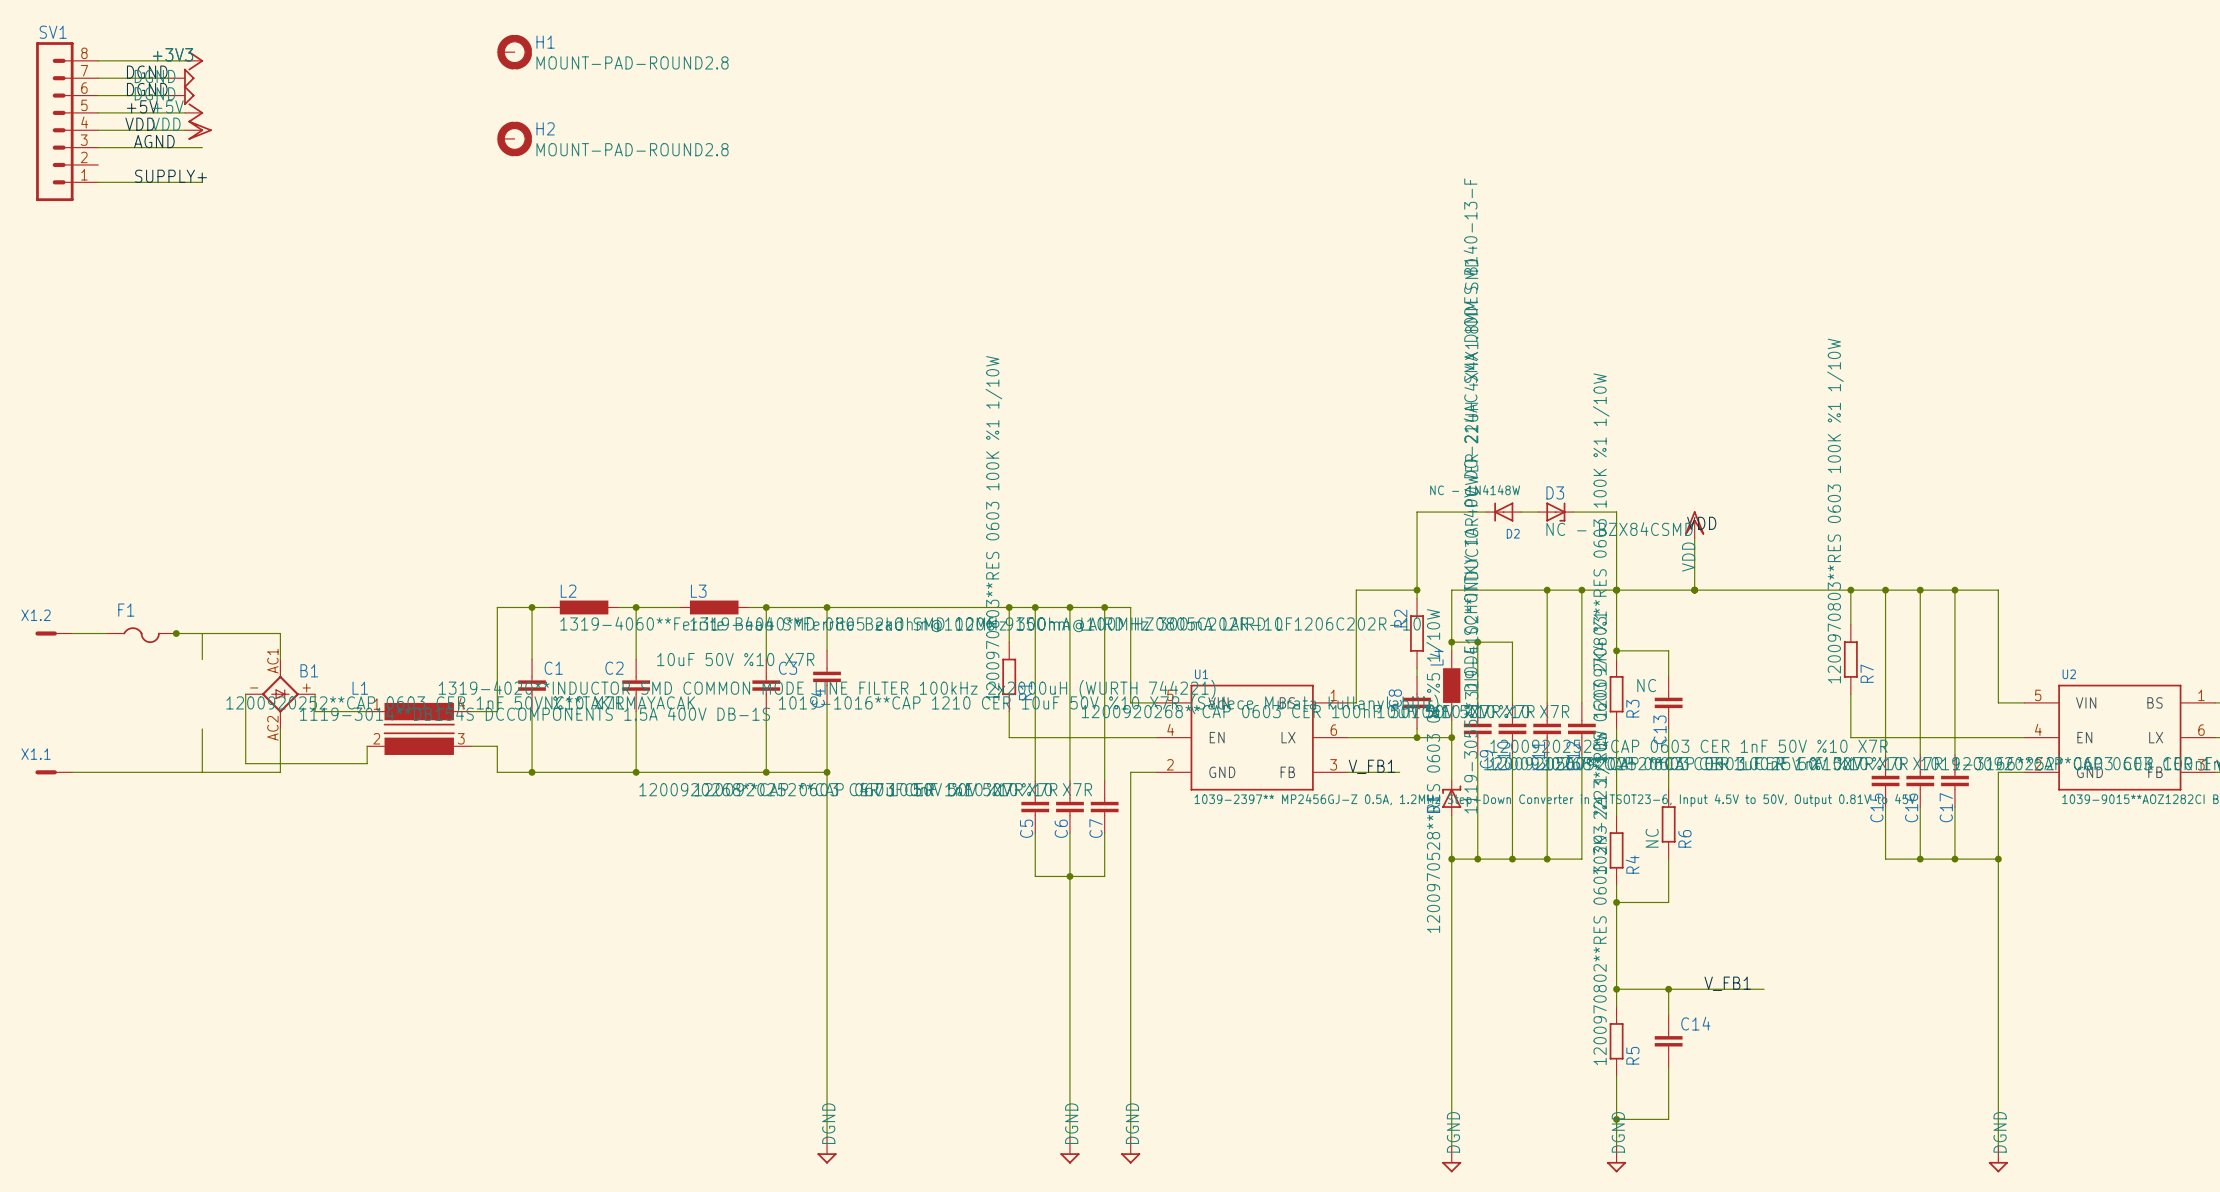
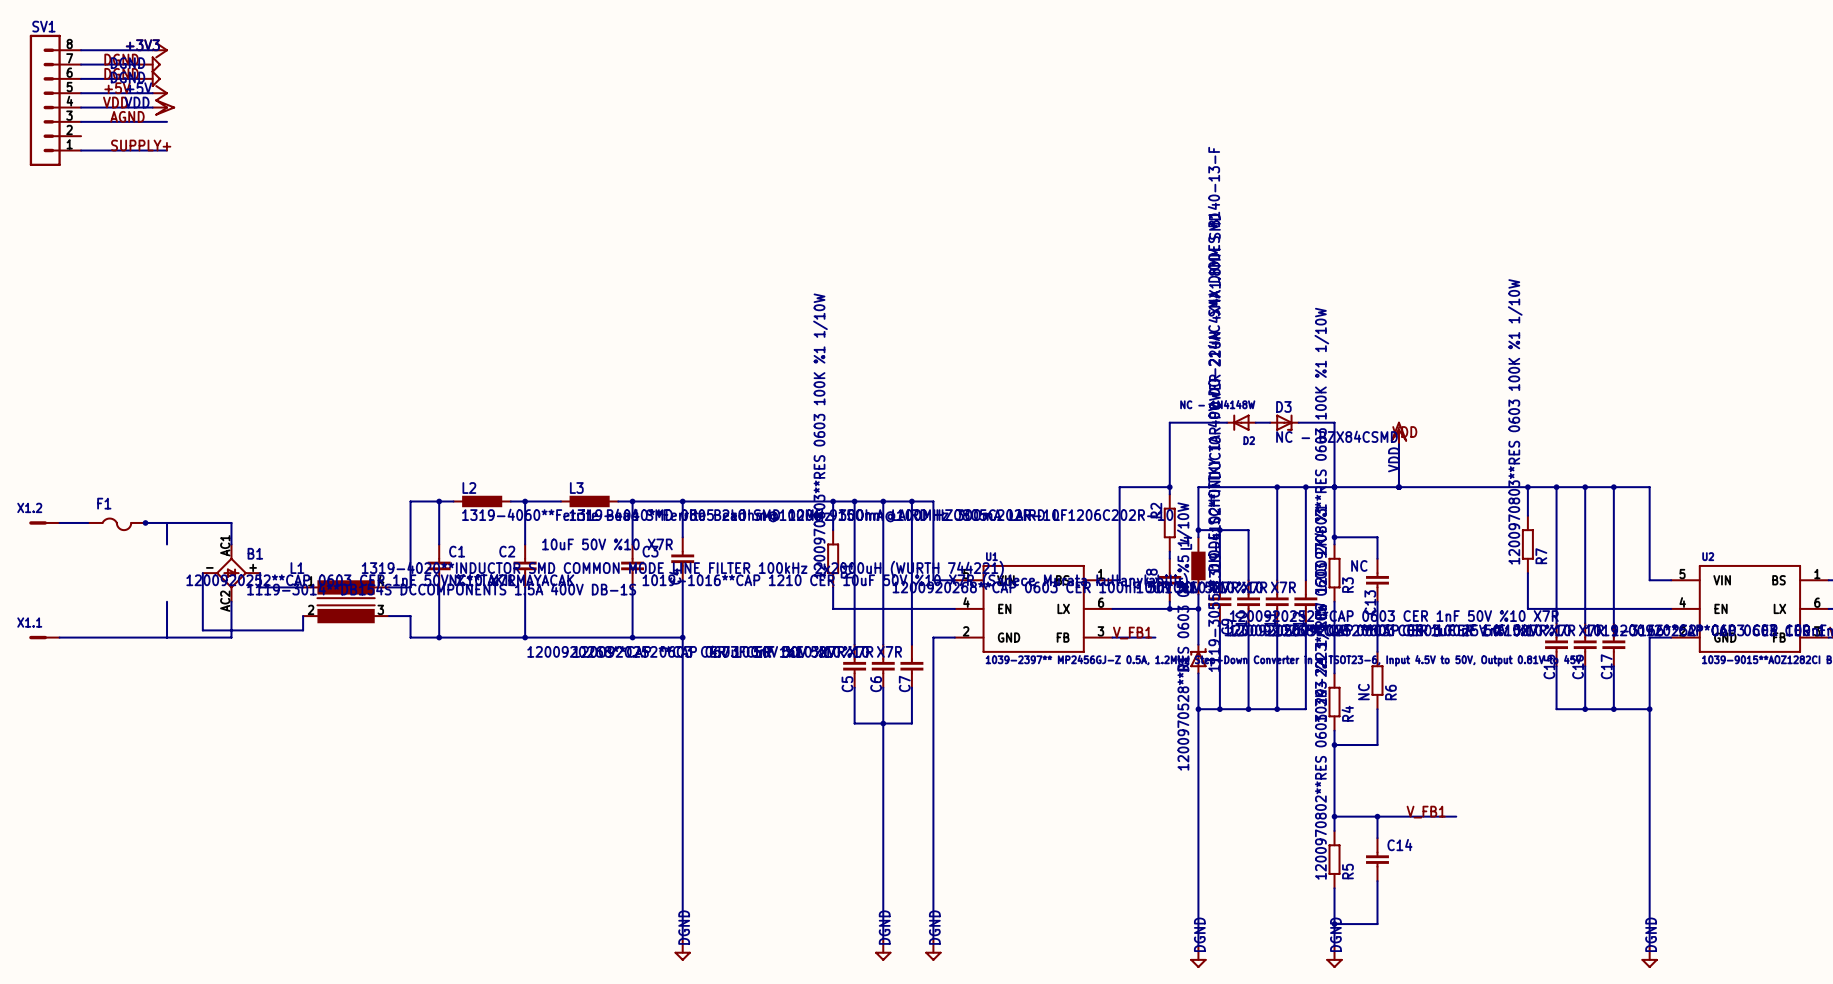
H1: MOUNT-PAD-ROUND2.8 (514, 52) -> none
H2: MOUNT-PAD-ROUND2.8 (514, 138) -> none

